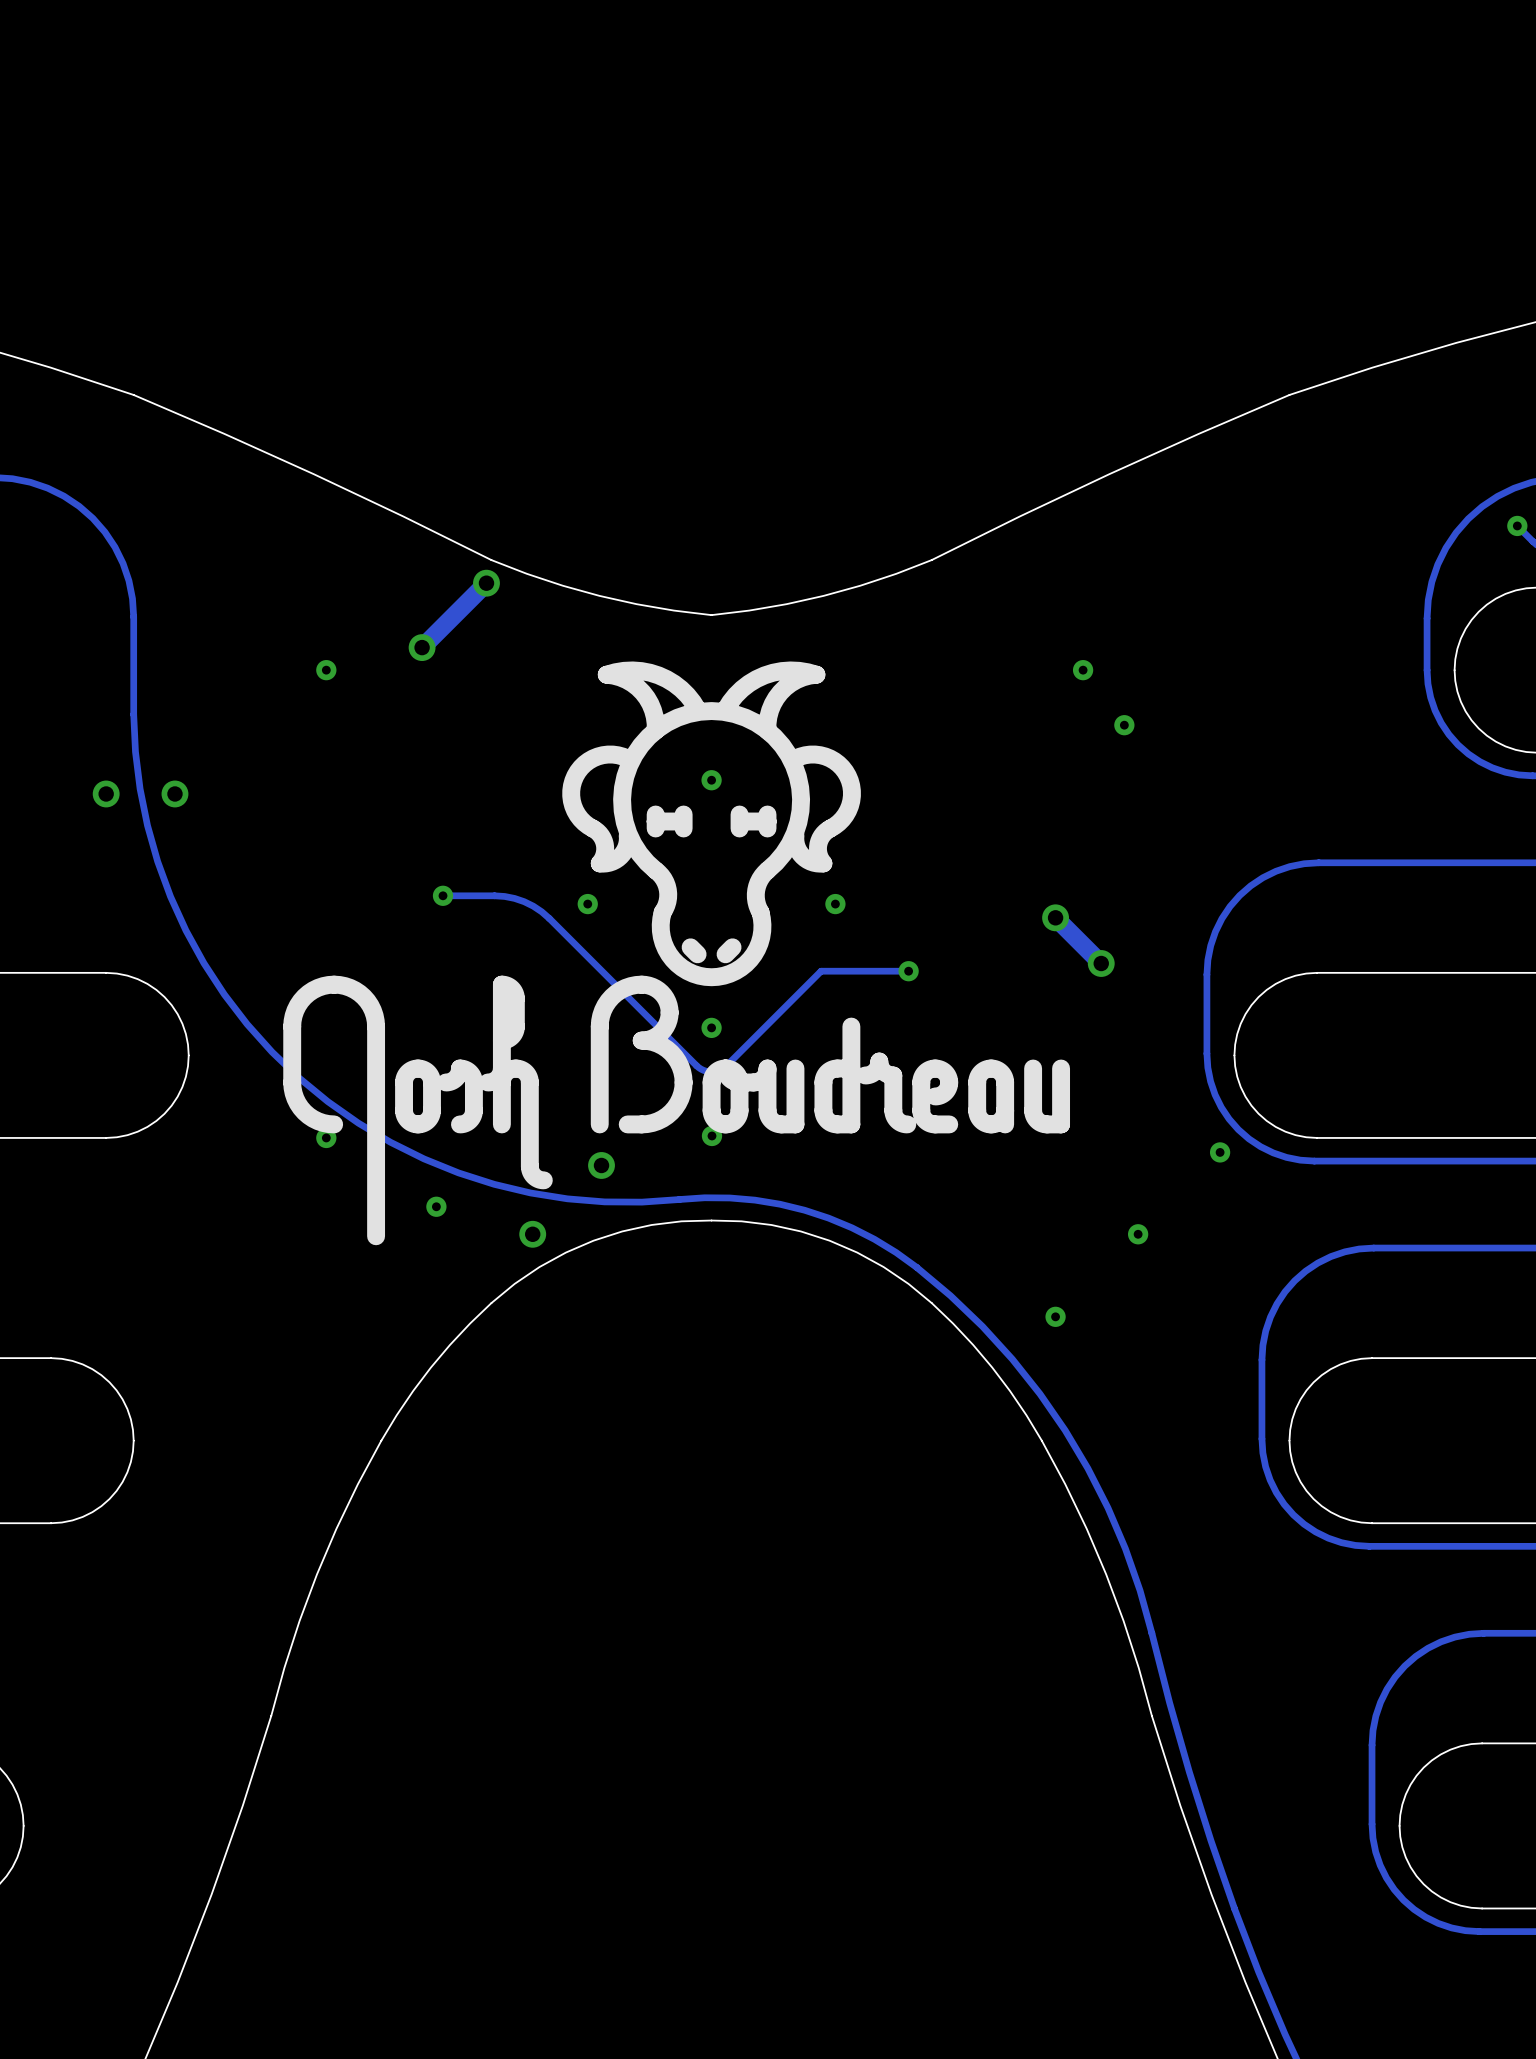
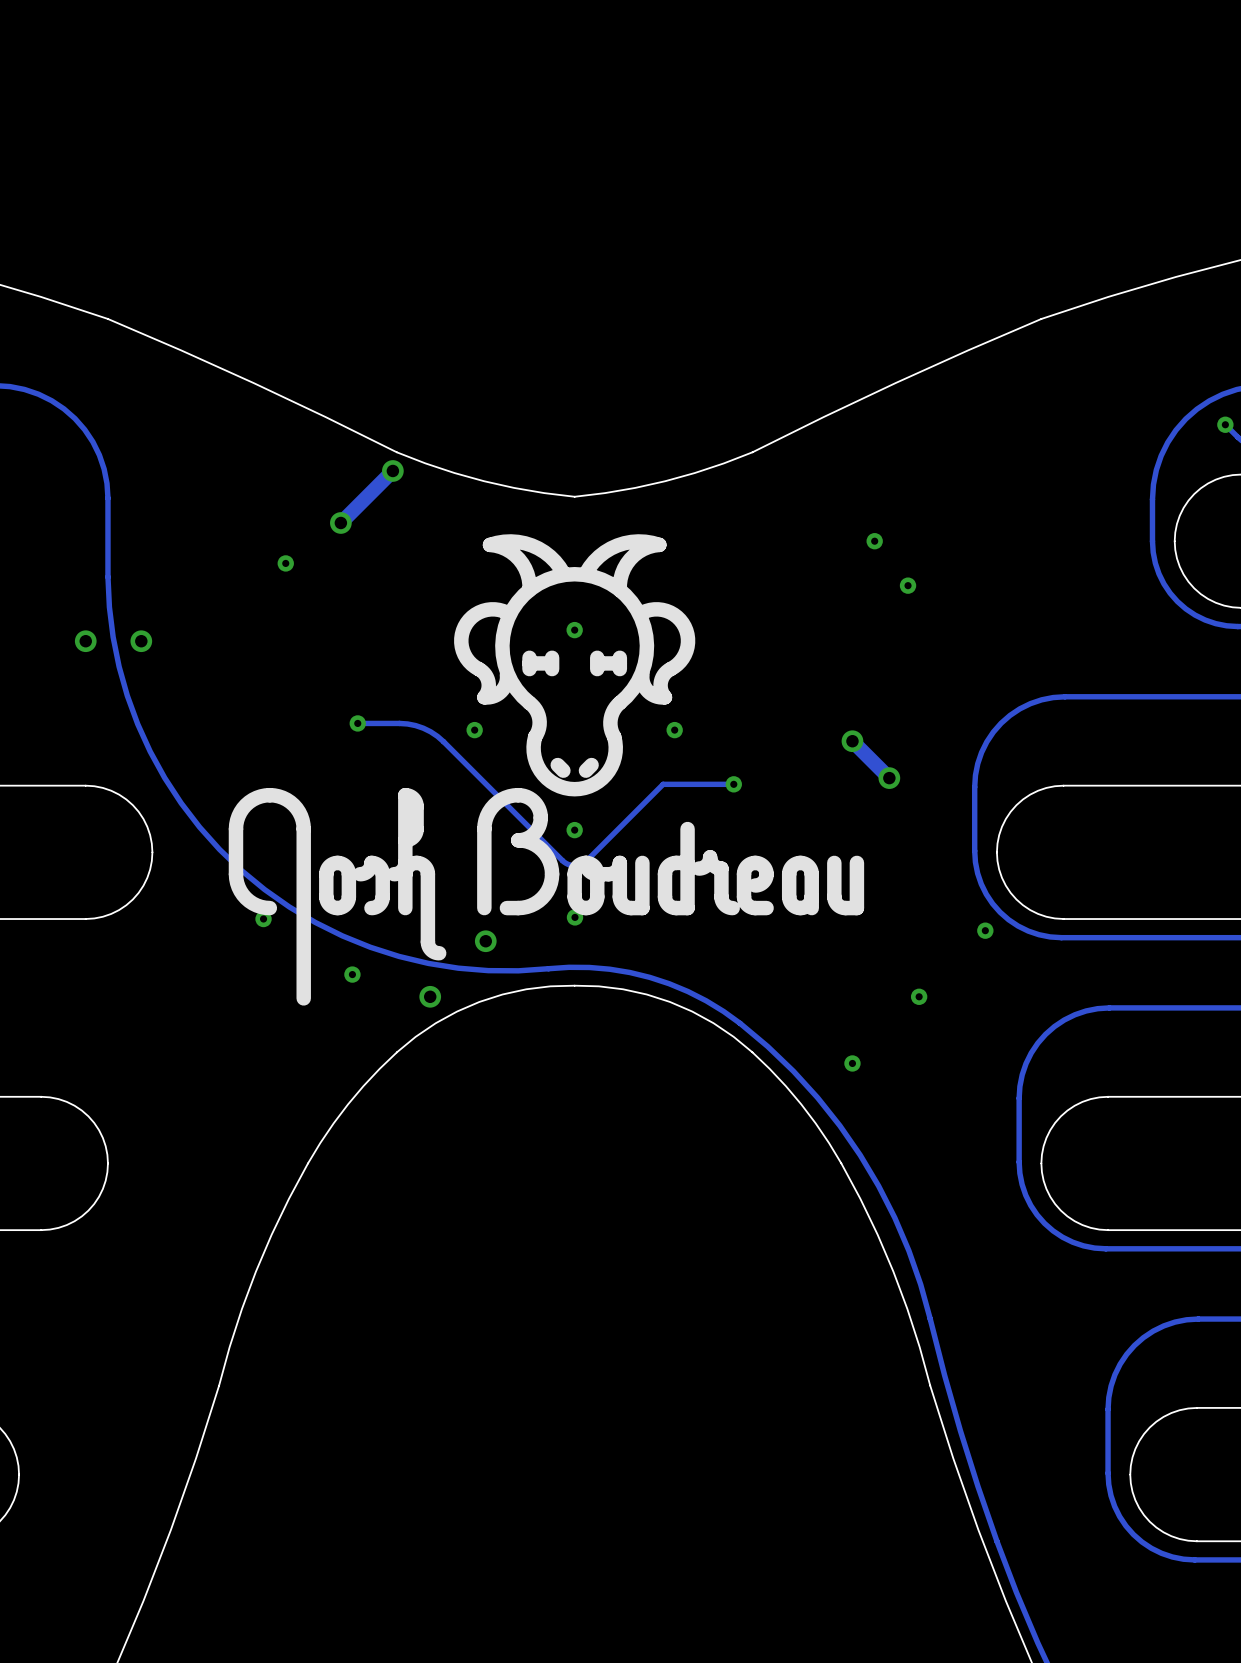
via position: (326, 670) -> (285, 563)

